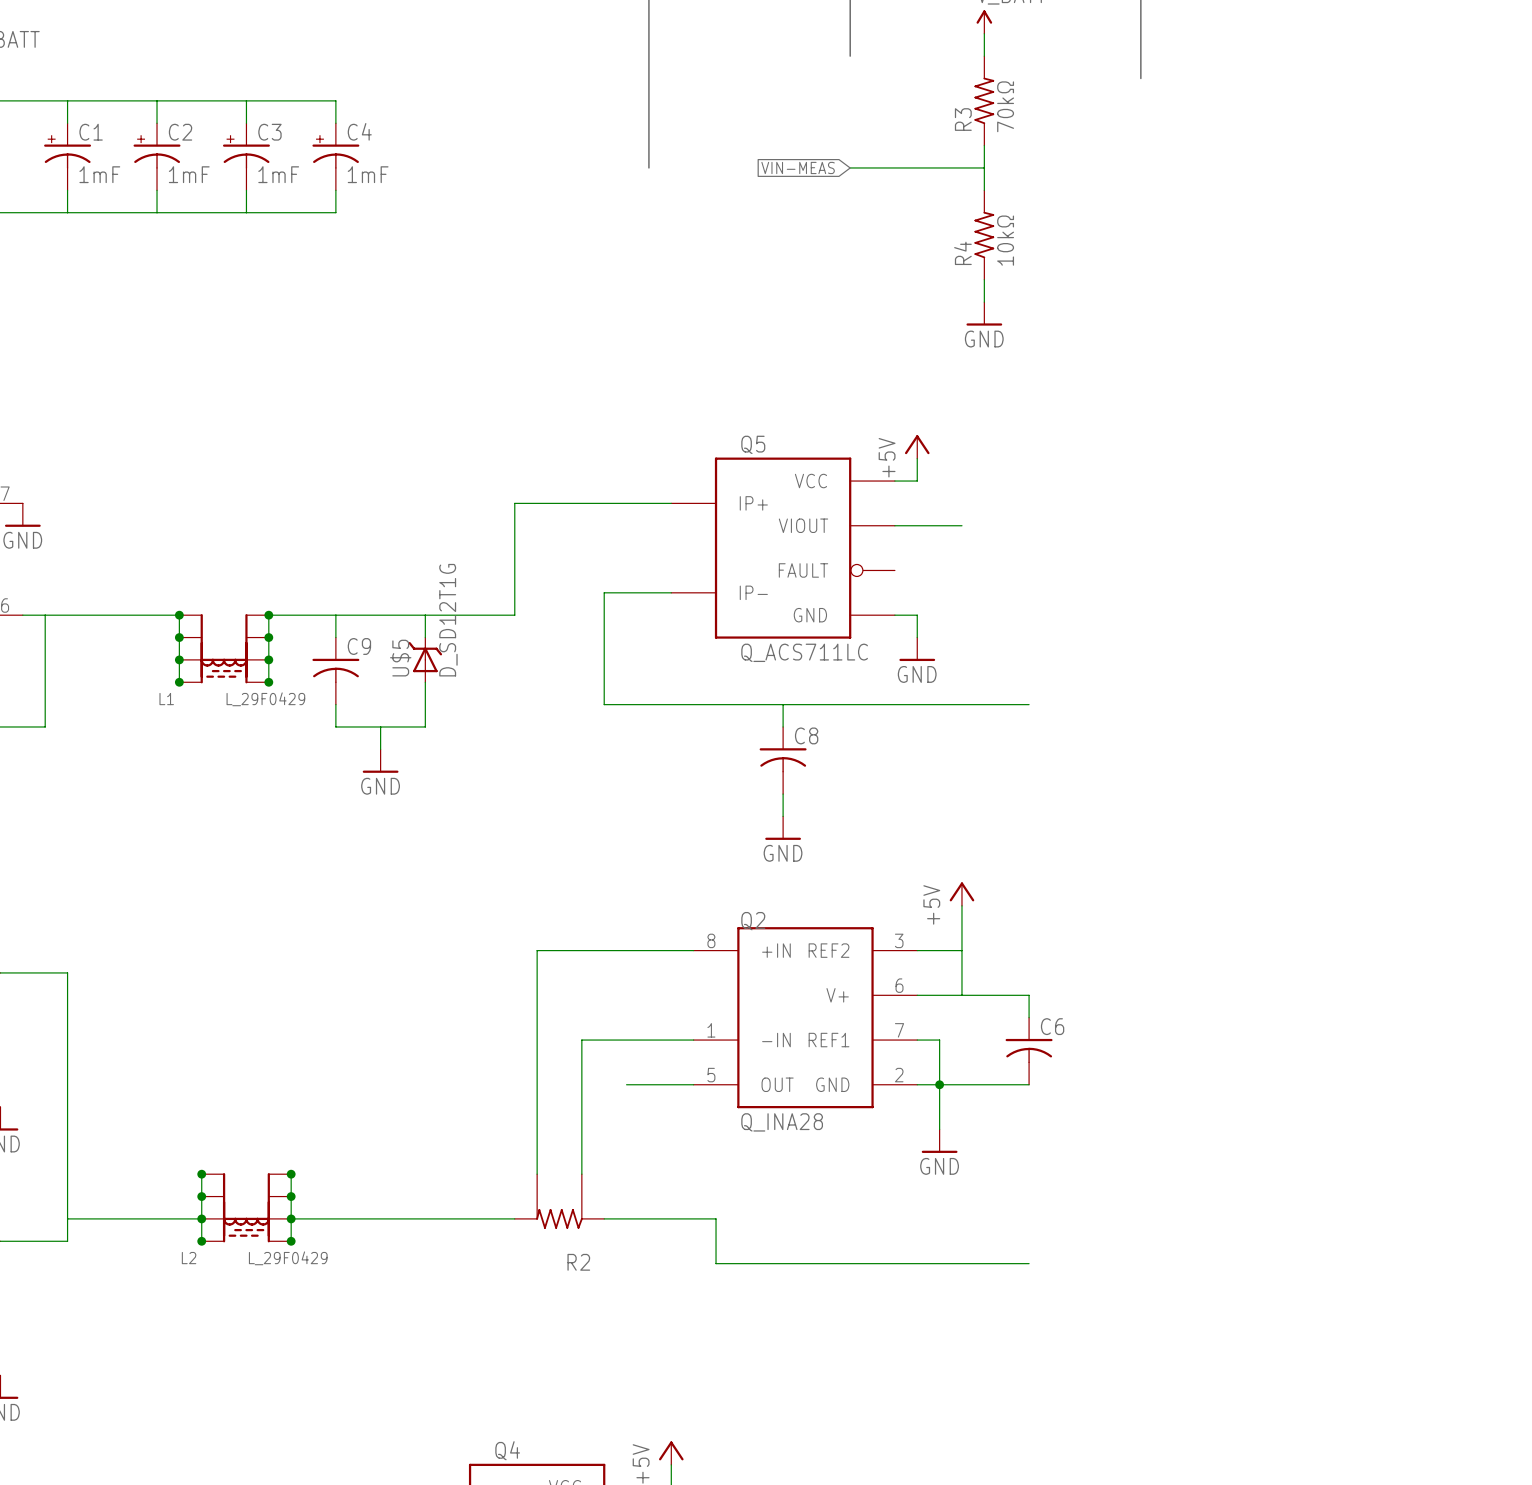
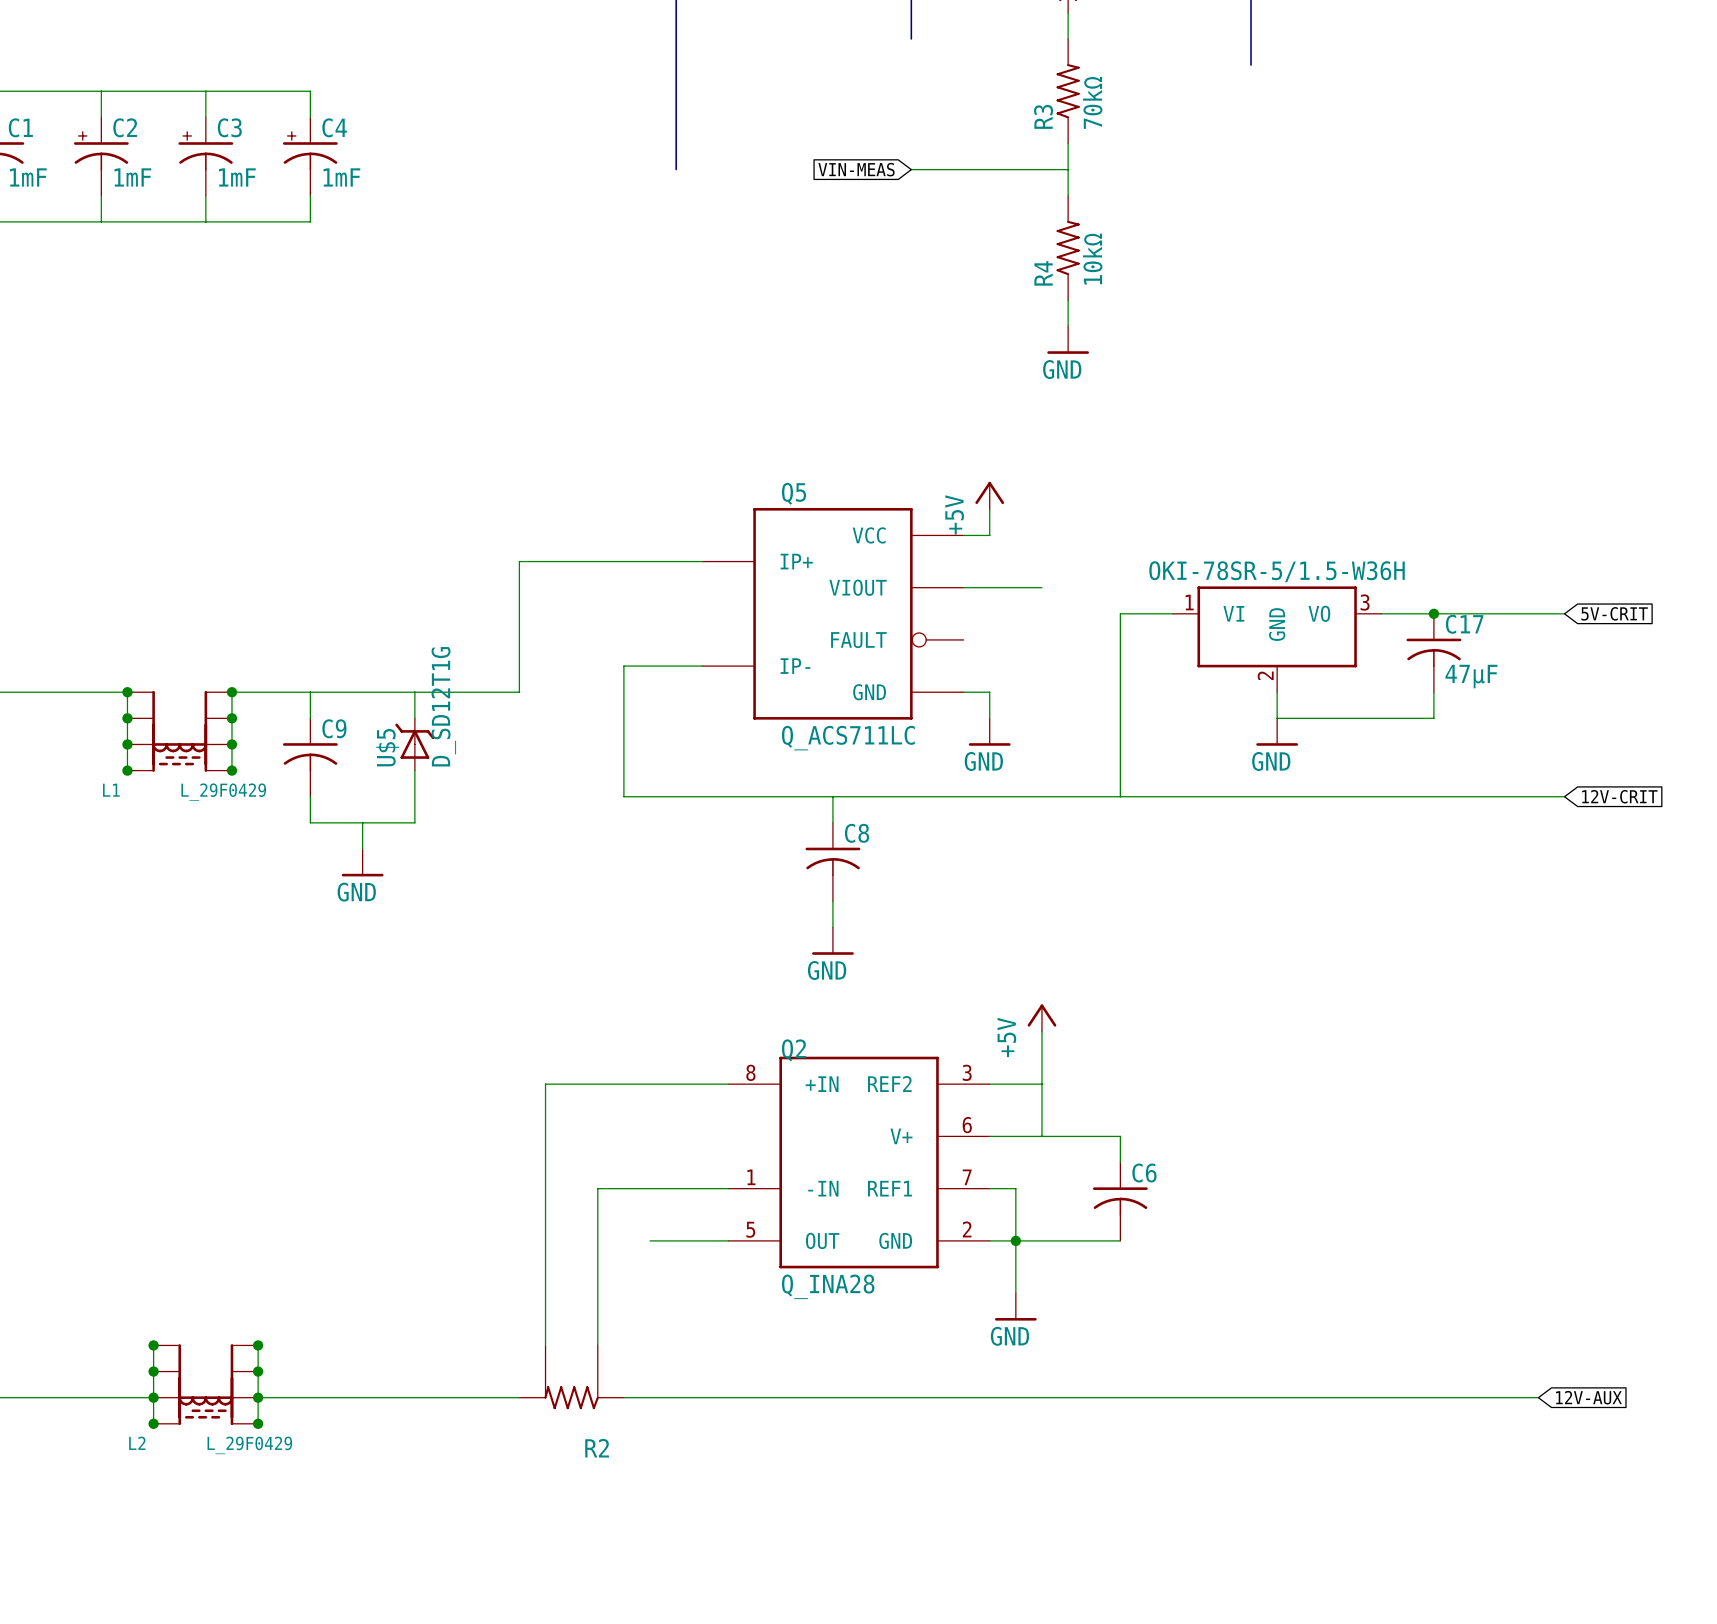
wire: none -> (1172, 613) (1120, 613) (1120, 796) (1564, 796)
wire: none -> (1381, 613) (1564, 613)
junction: none -> (1433, 613)
global label: none -> 5V-CRIT (1614, 613)
OKI-78SR-5/1.5-W36H: none -> (1277, 639)
C17: none -> 47µF (1433, 653)
wire: none -> (1277, 692) (1277, 718) (1433, 718) (1433, 692)
power symbol: none -> GND (1277, 732)
global label: none -> 12V-CRIT (1619, 796)
wire: (716, 1218) (716, 1263) (1029, 1263) -> (754, 1397) (1538, 1397)
global label: none -> 12V-AUX (1588, 1397)

